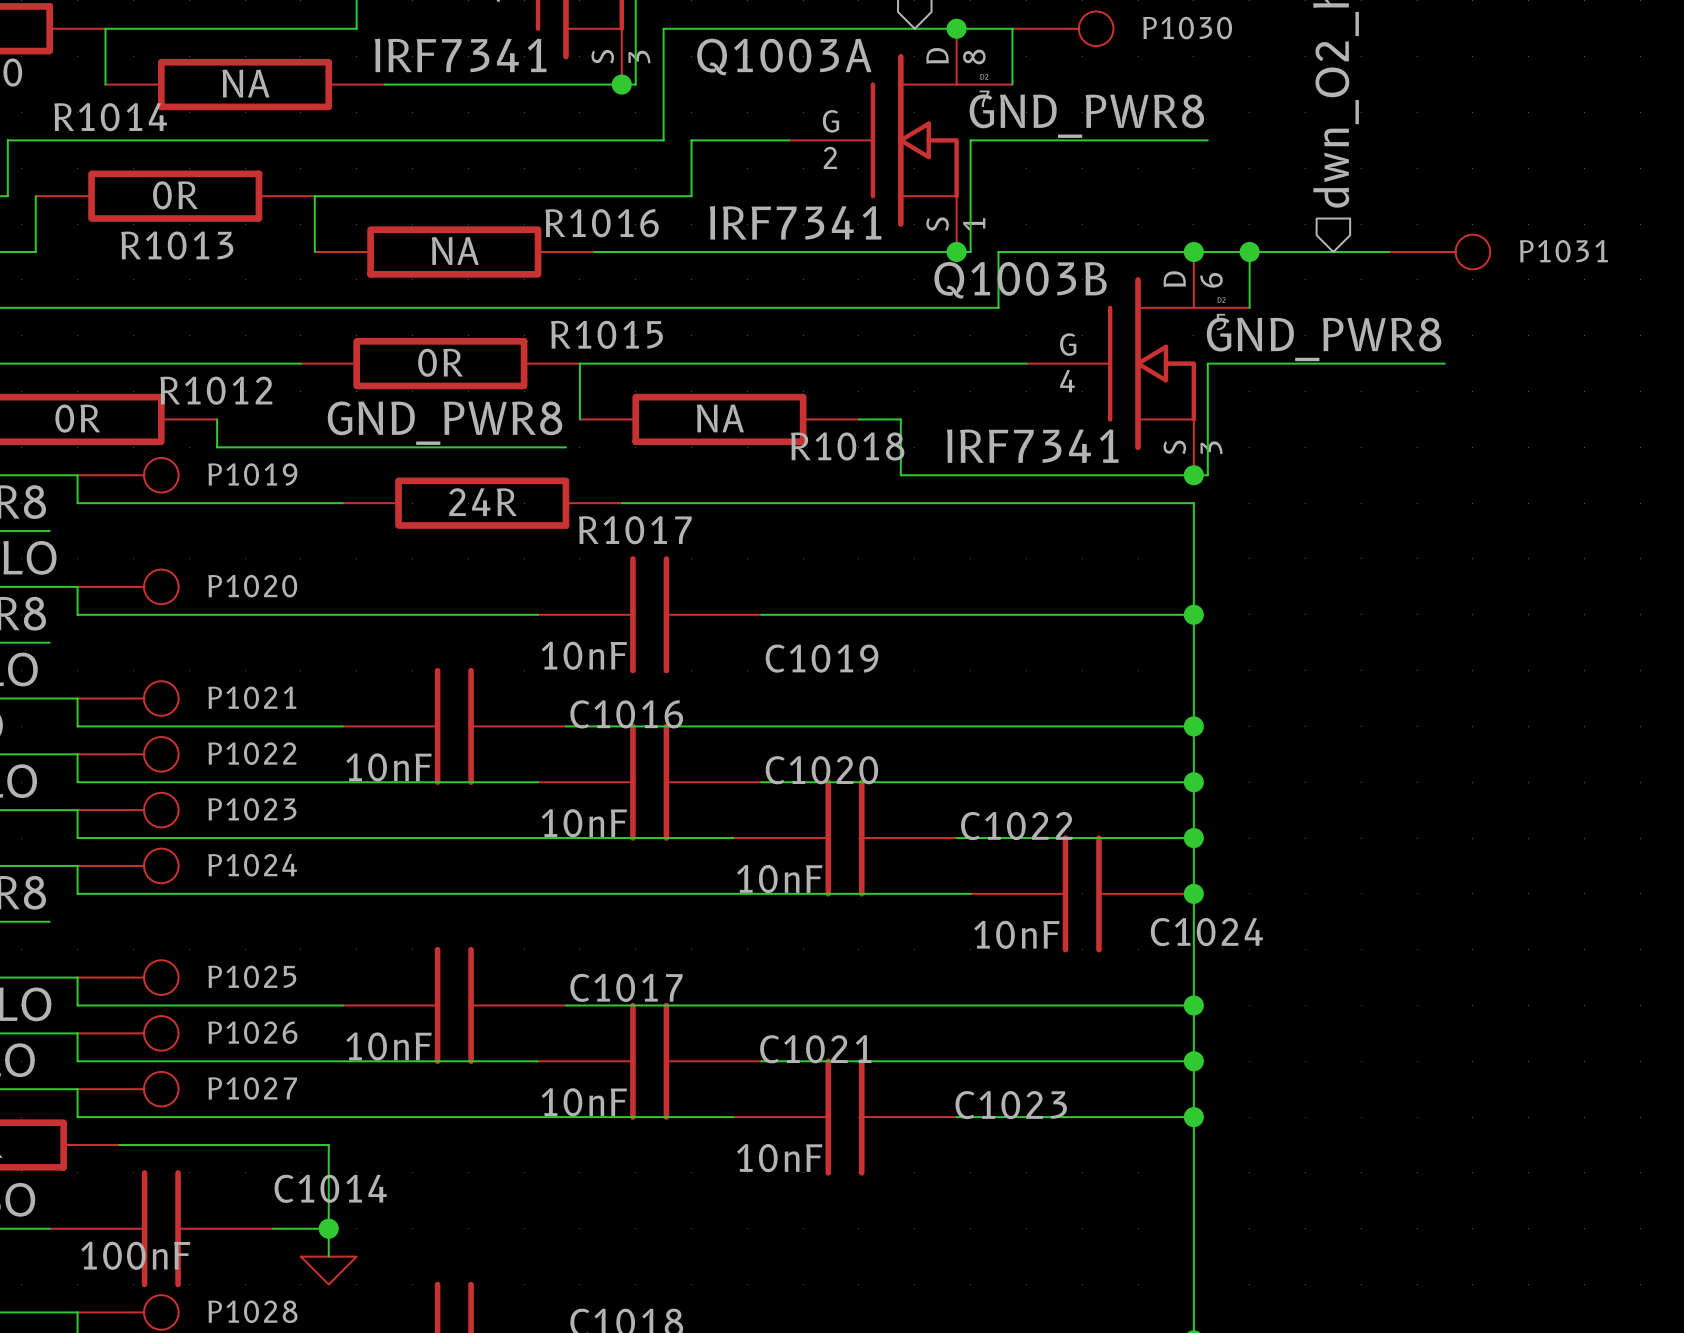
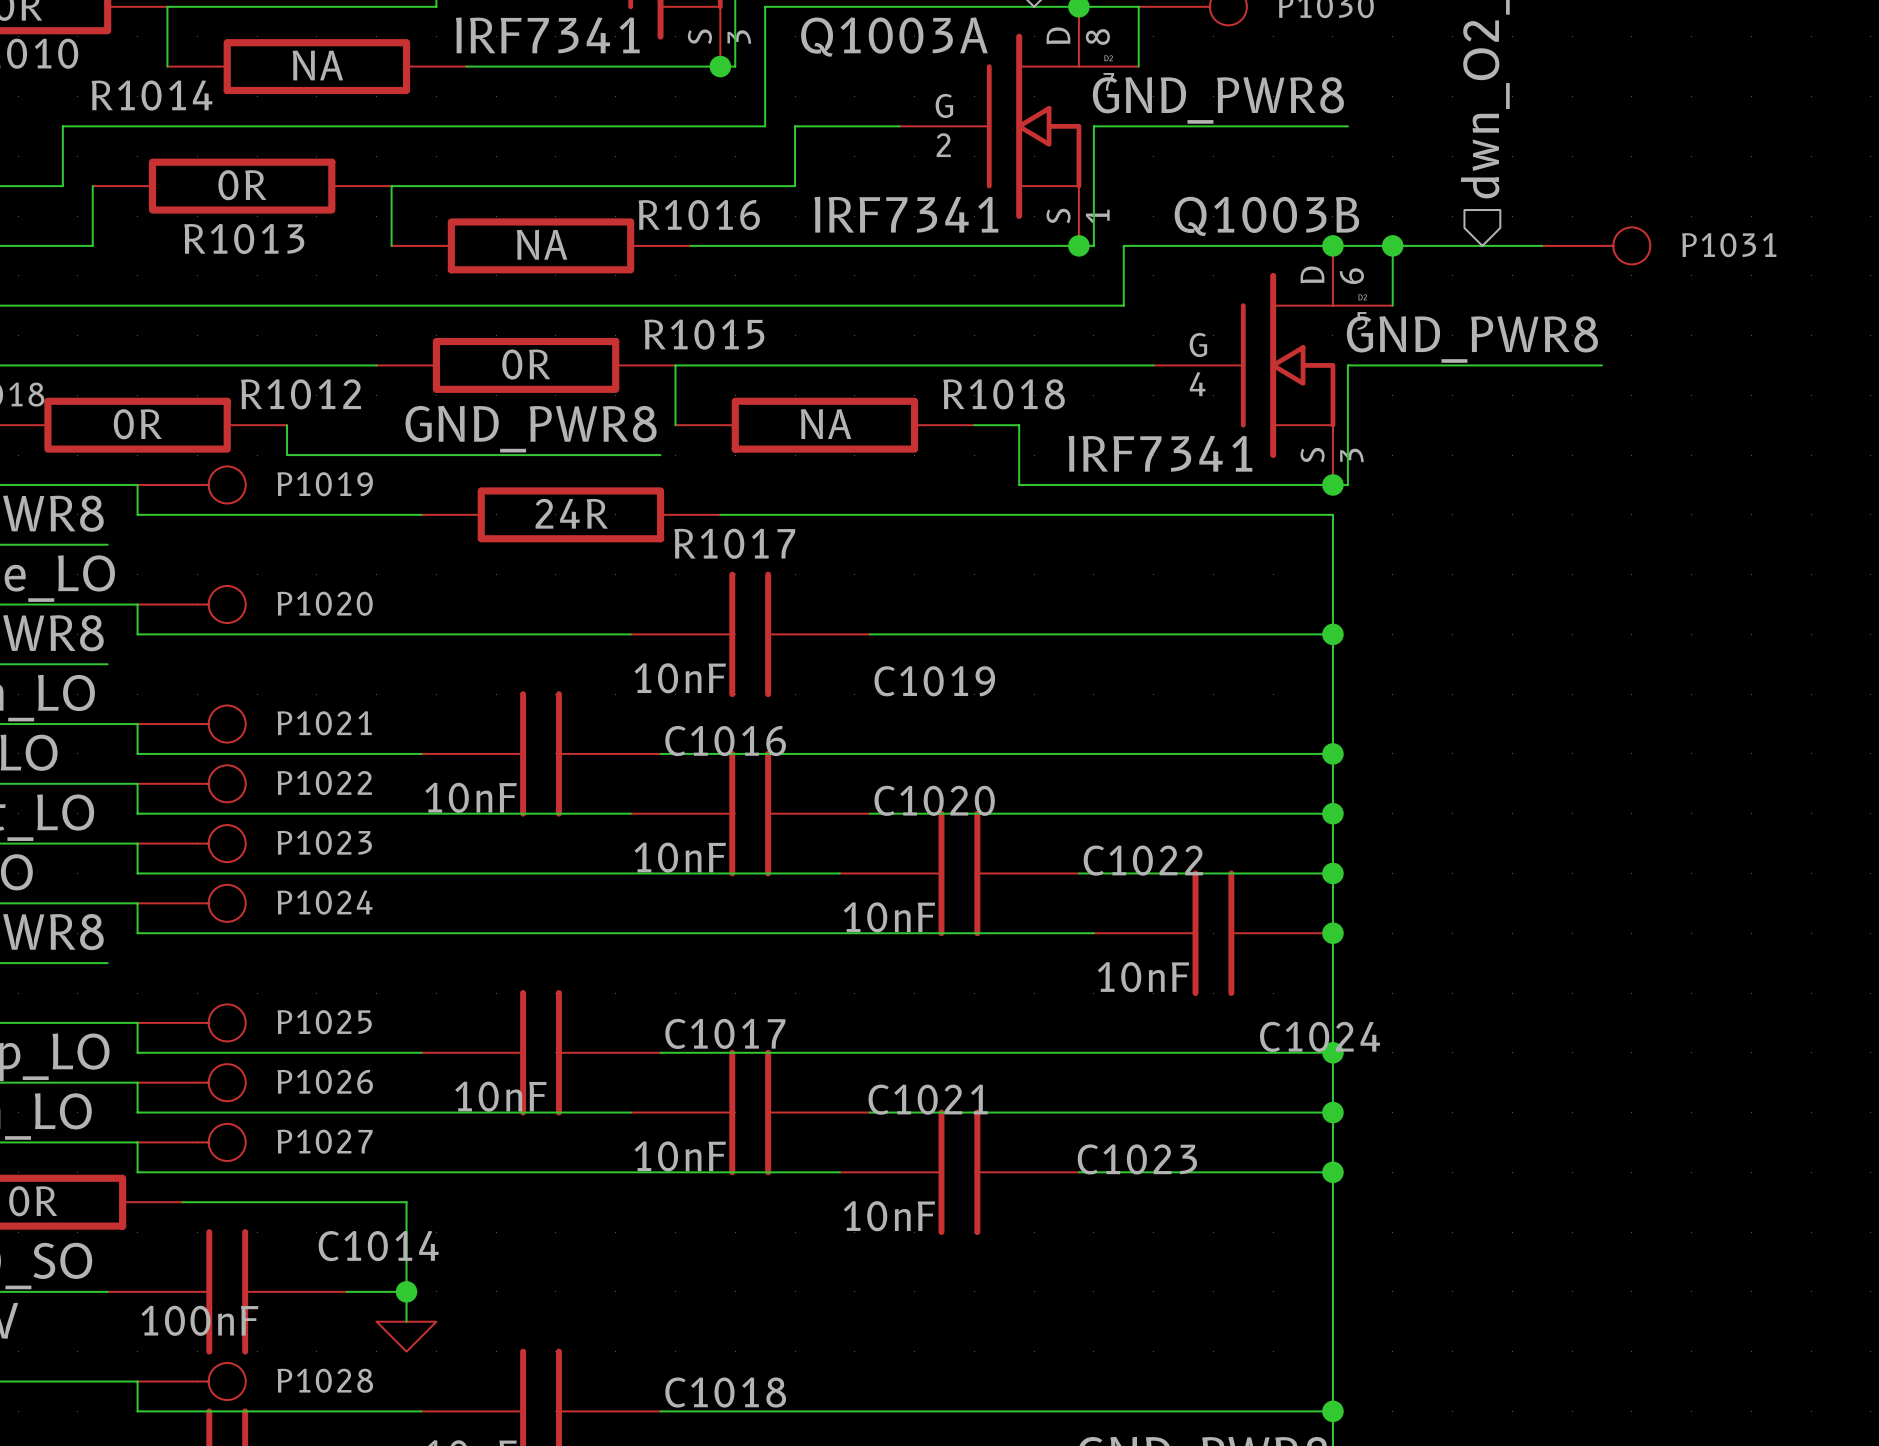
R1014 name position: R1014 (110, 117) -> R1014 (152, 95)
Q1003B name position: Q1003B (1020, 280) -> Q1003B (1266, 216)
R1012 name position: R1012 (216, 390) -> R1012 (301, 394)
R1018 name position: R1018 (847, 446) -> R1018 (1004, 394)
C1024 name position: C1024 (1206, 932) -> C1024 (1320, 1036)
C1017 value position: 10nF (388, 1046) -> 10nF (500, 1096)
C1014 name position: C1014 (330, 1188) -> C1014 (378, 1246)

